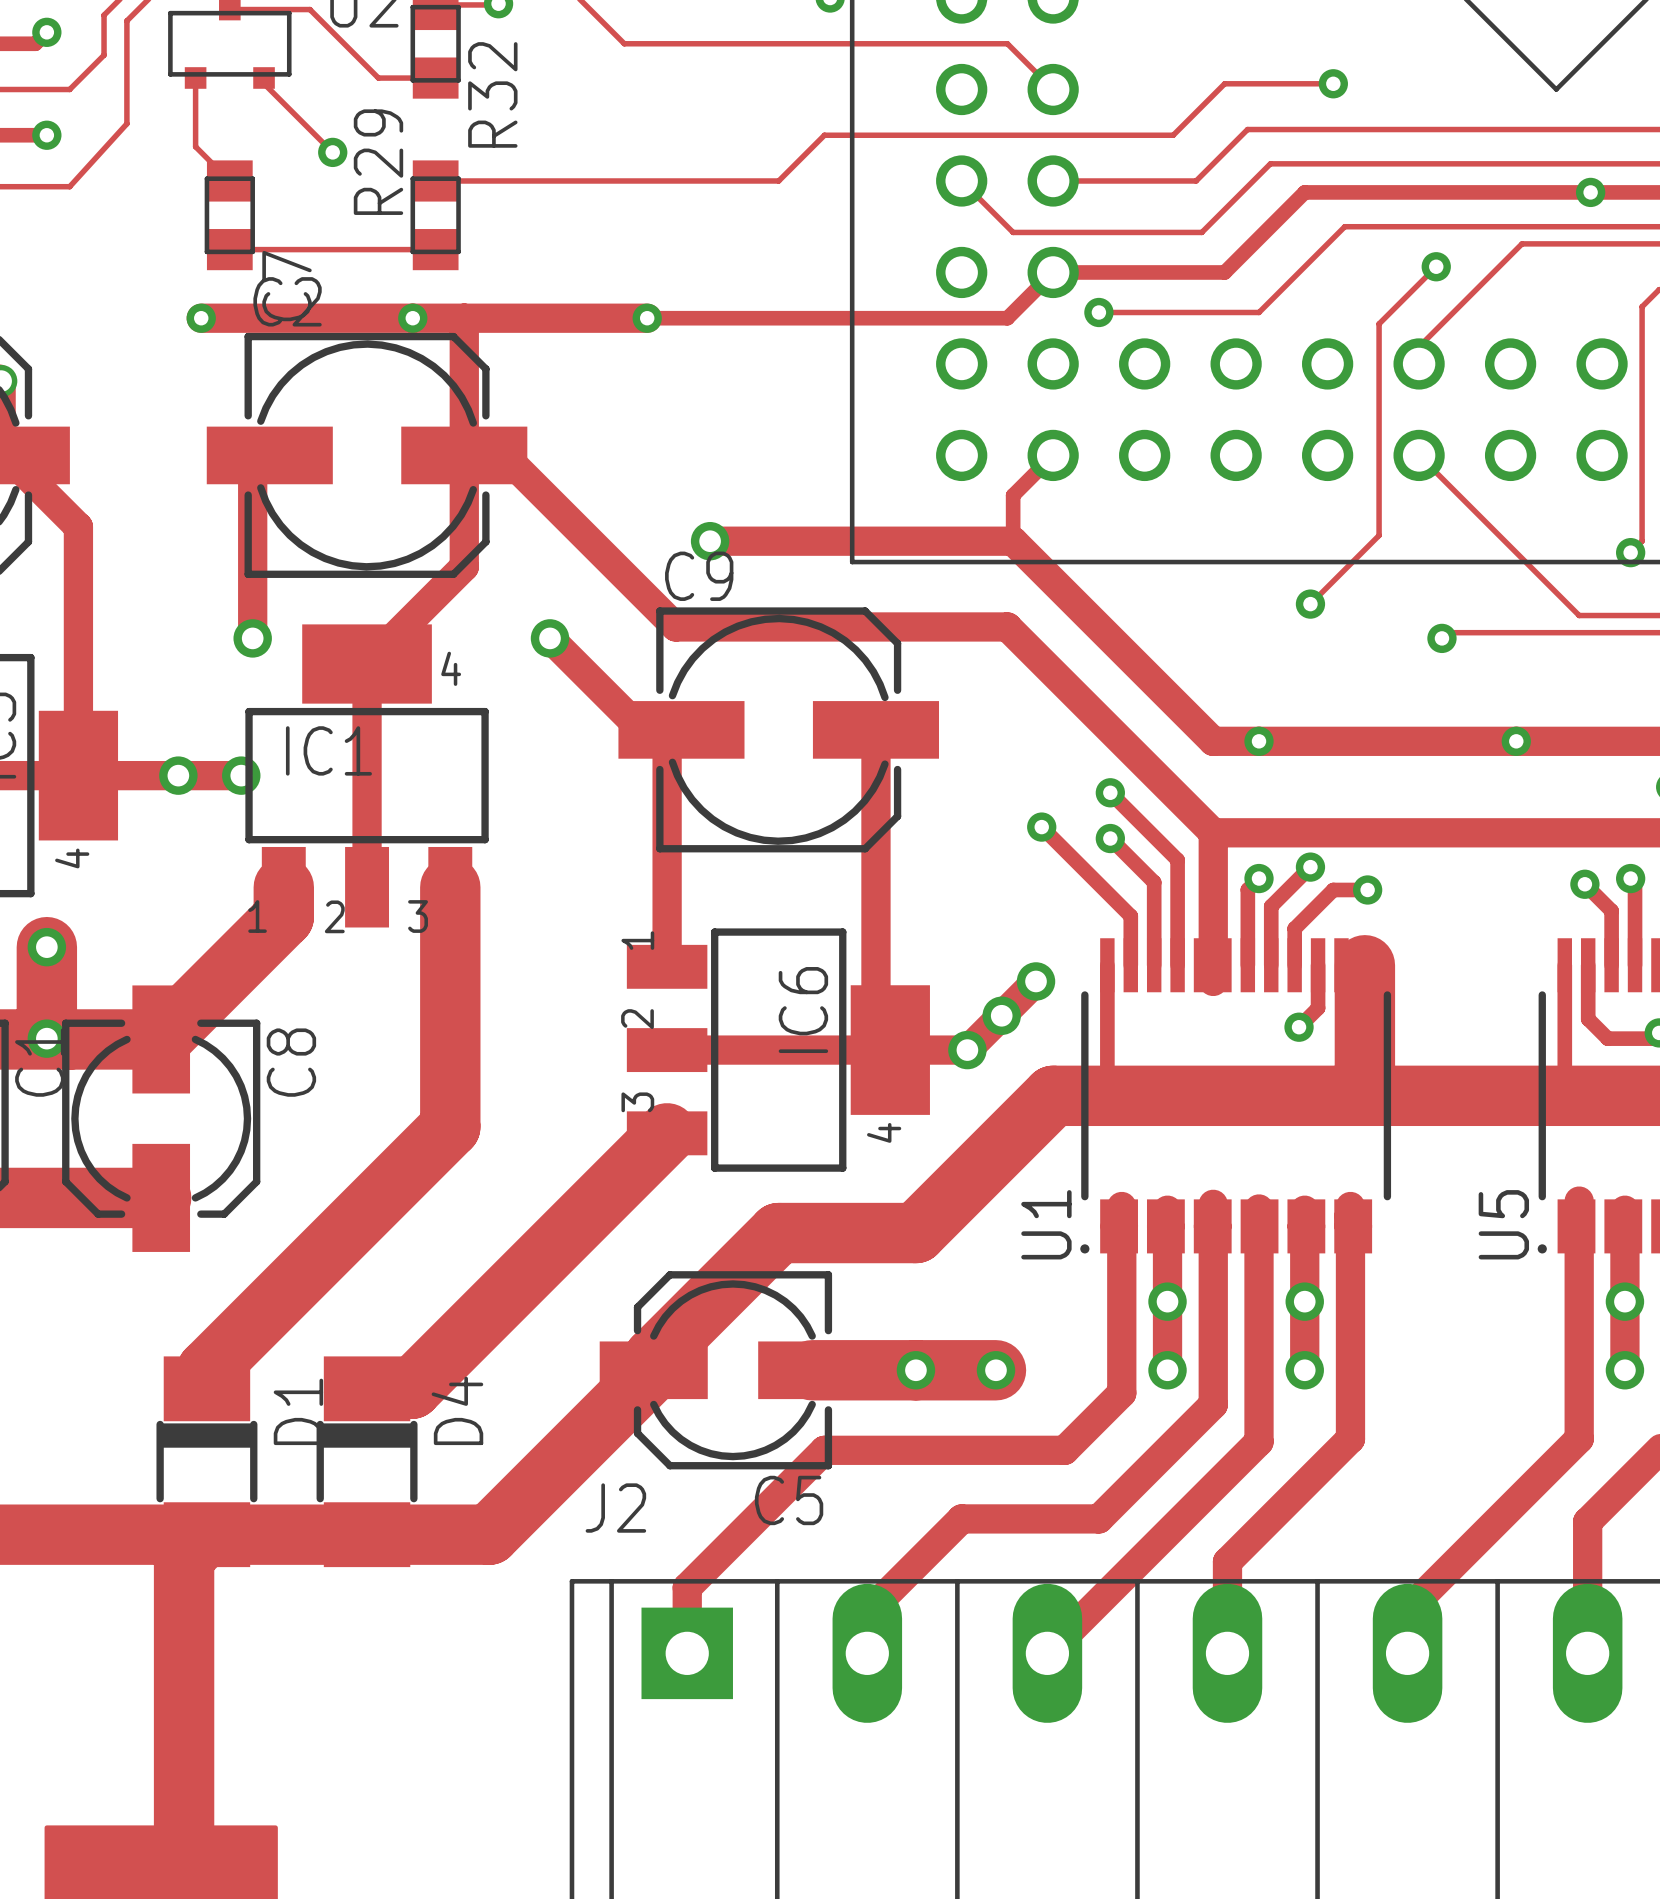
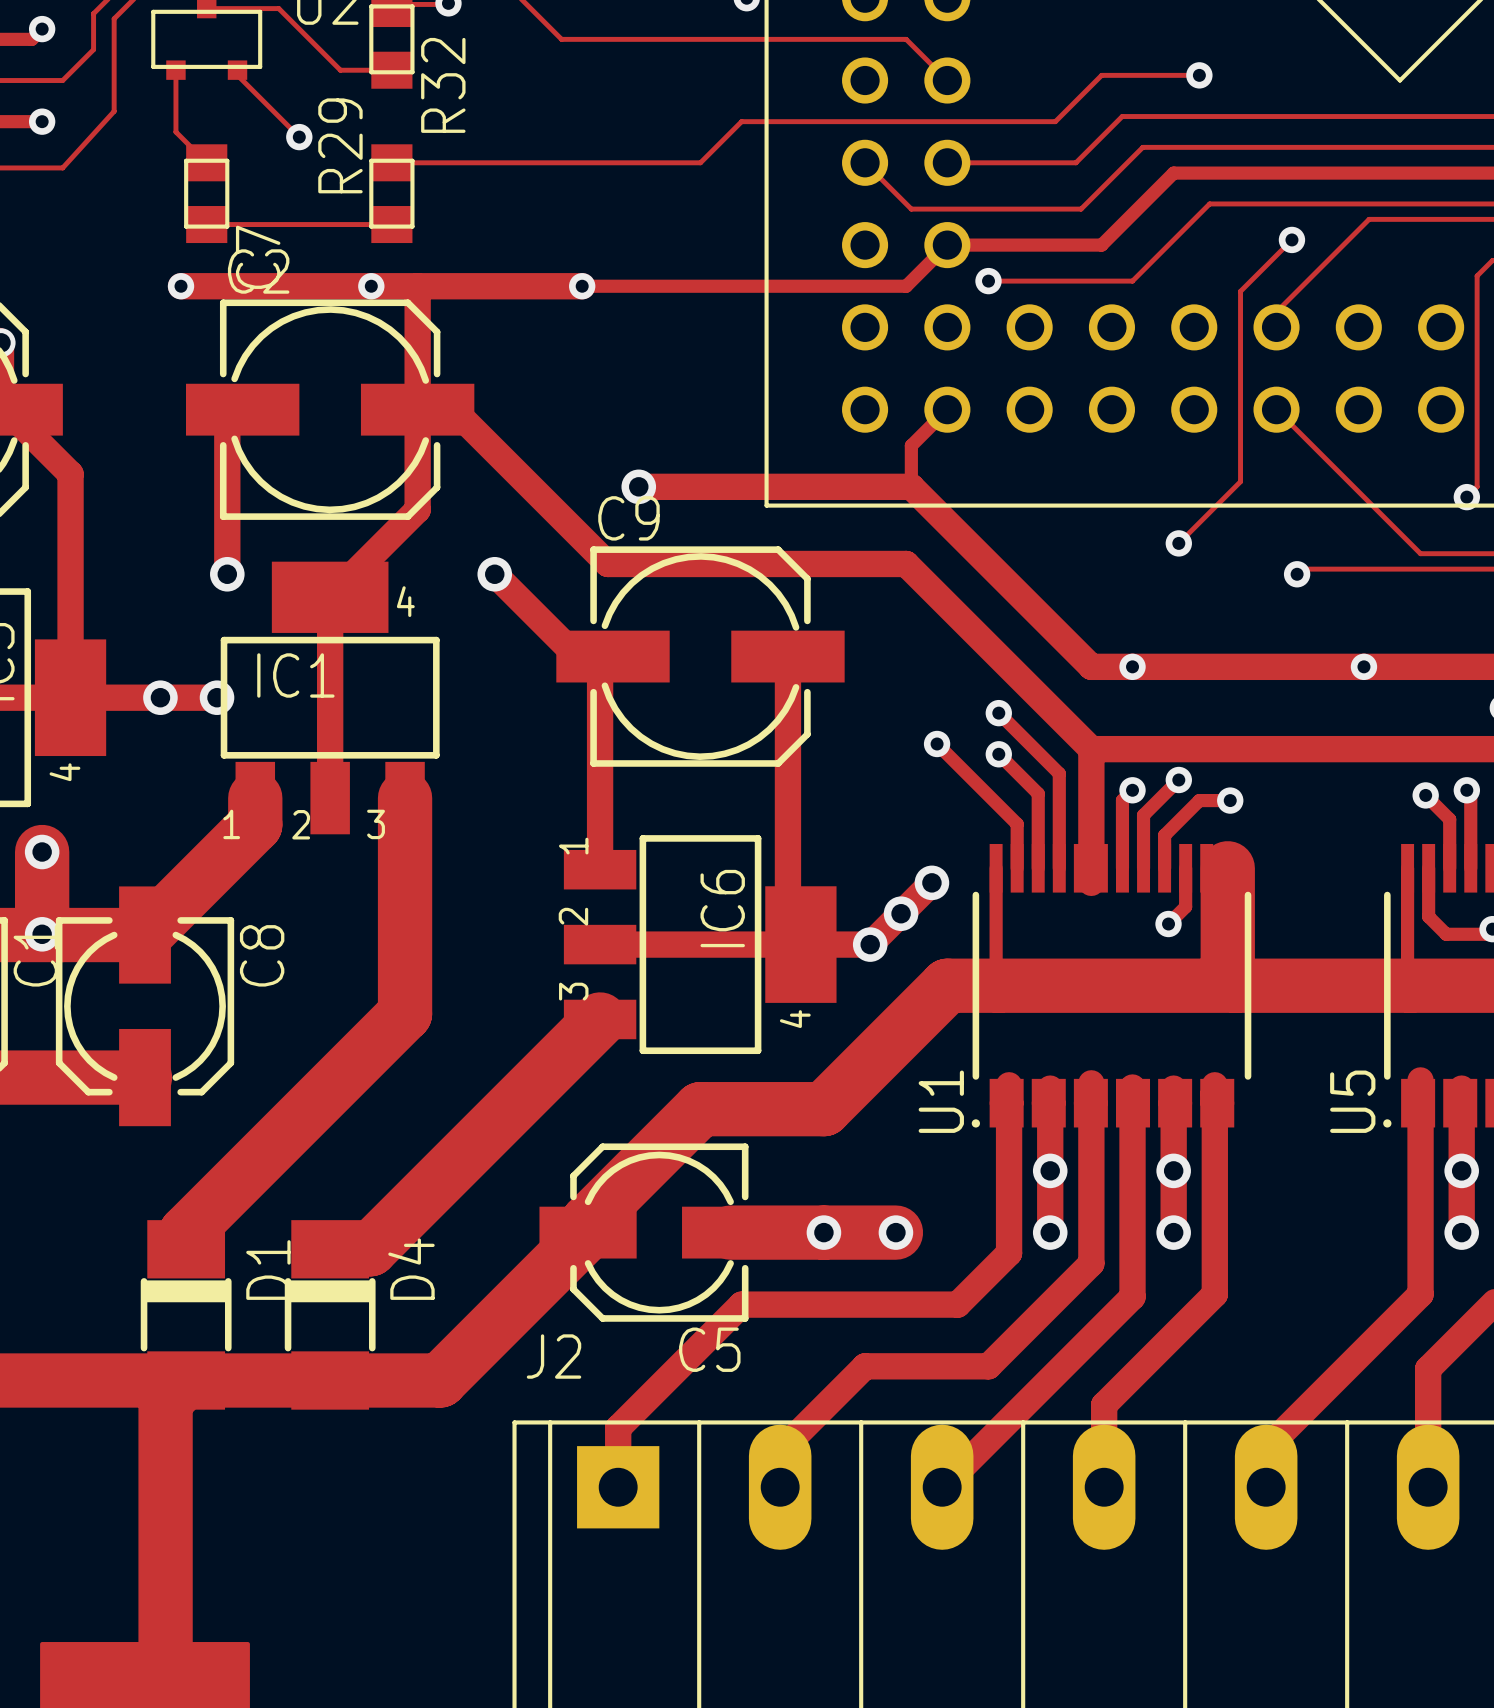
via: (1590, 192) -> none

